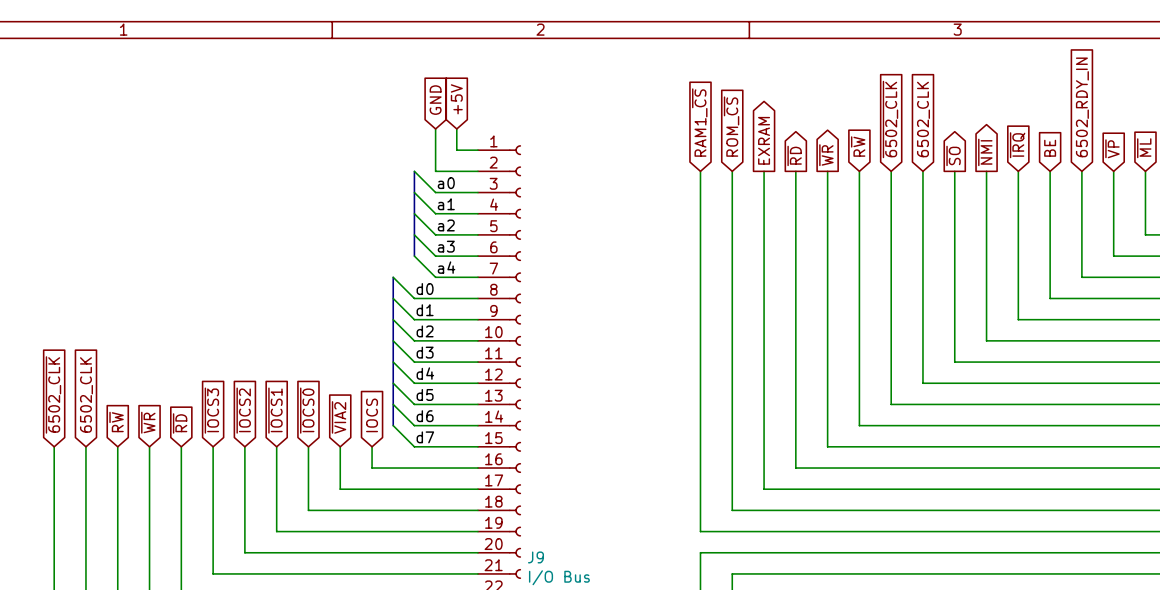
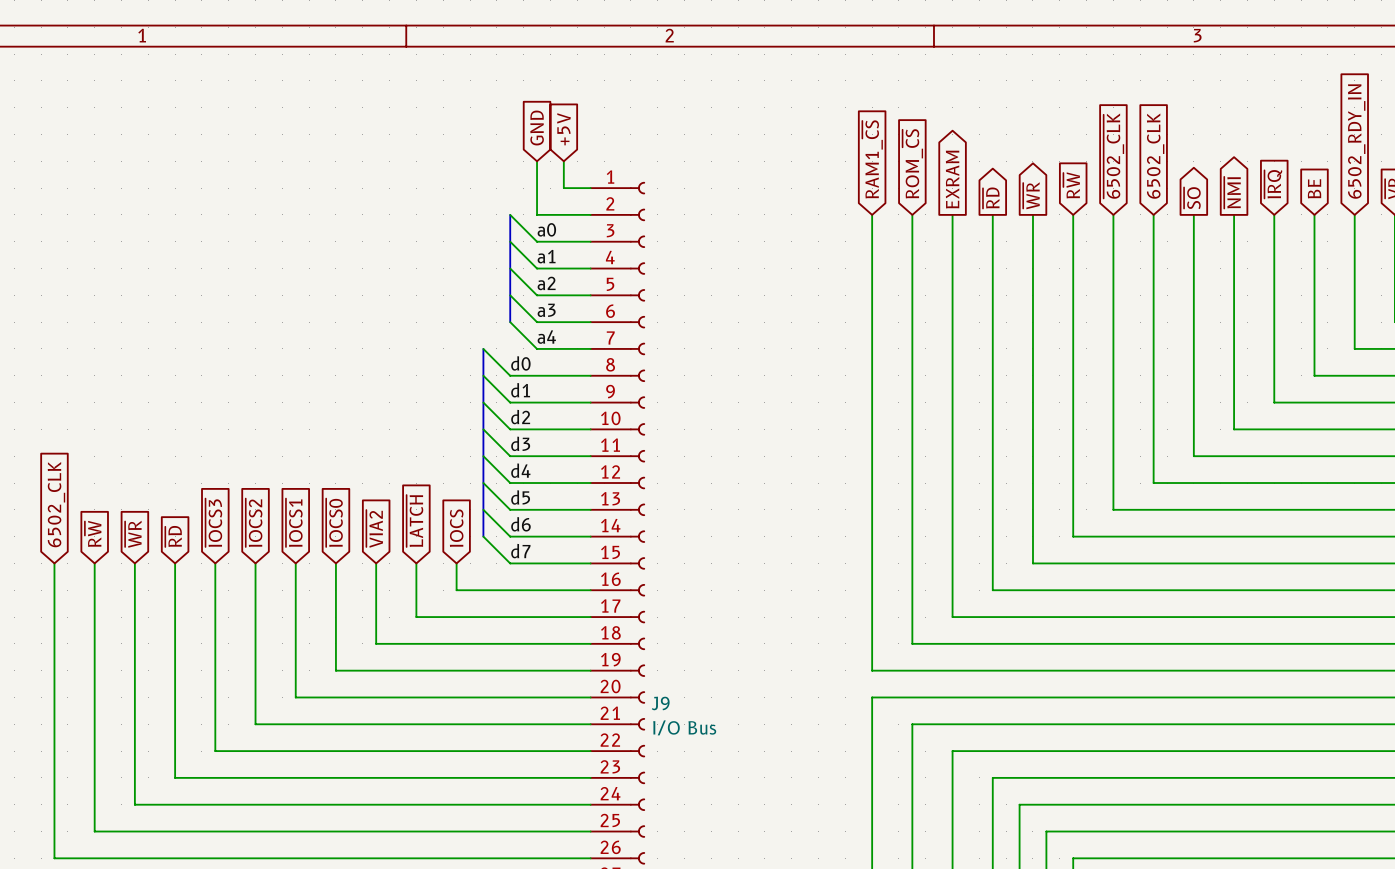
global label: ~{6502_CLK} (53, 394) -> 6502_CLK (56, 504)
global label: 6502_CLK (86, 394) -> R~{W} (93, 533)
global label: ~{IOCS3} (211, 410) -> ~{IOCS2} (254, 522)
global label: ~{IOCS2} (243, 410) -> ~{IOCS1} (294, 522)
global label: ~{IOCS1} (275, 410) -> ~{IOCS0} (334, 522)
global label: ~{IOCS0} (307, 410) -> ~{VIA2} (374, 528)
global label: ~{VIA2} (339, 417) -> ~{LATCH} (414, 521)
global label: R~{W} (116, 421) -> ~{WR} (133, 534)
global label: ~{WR} (148, 422) -> ~{RD} (173, 536)
global label: ~{RD} (180, 423) -> ~{IOCS3} (213, 522)

